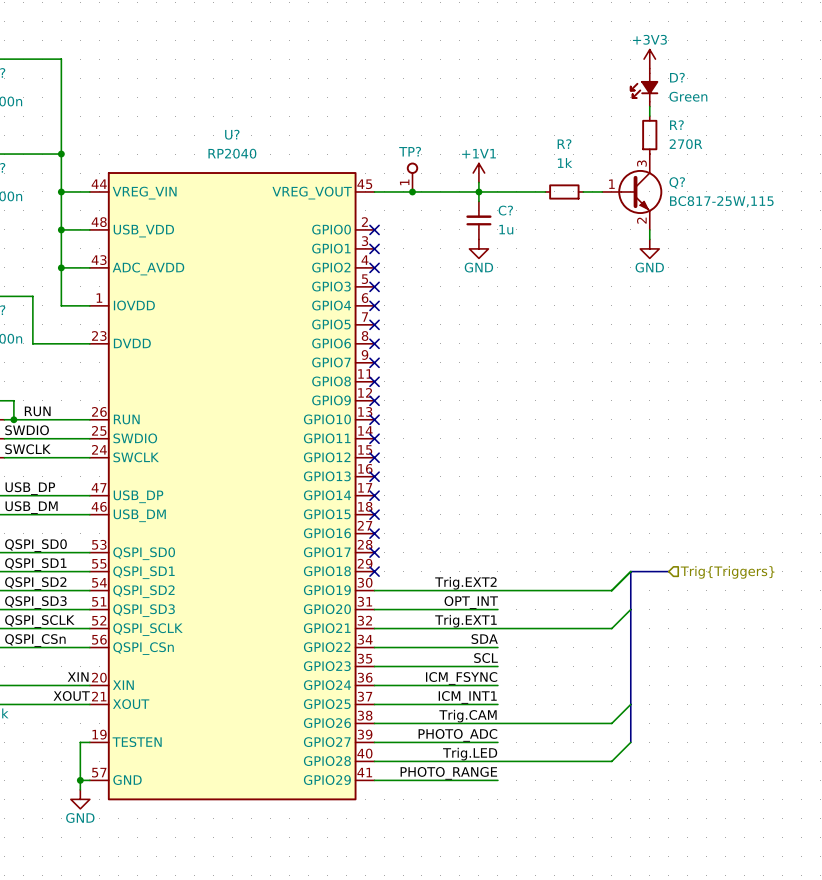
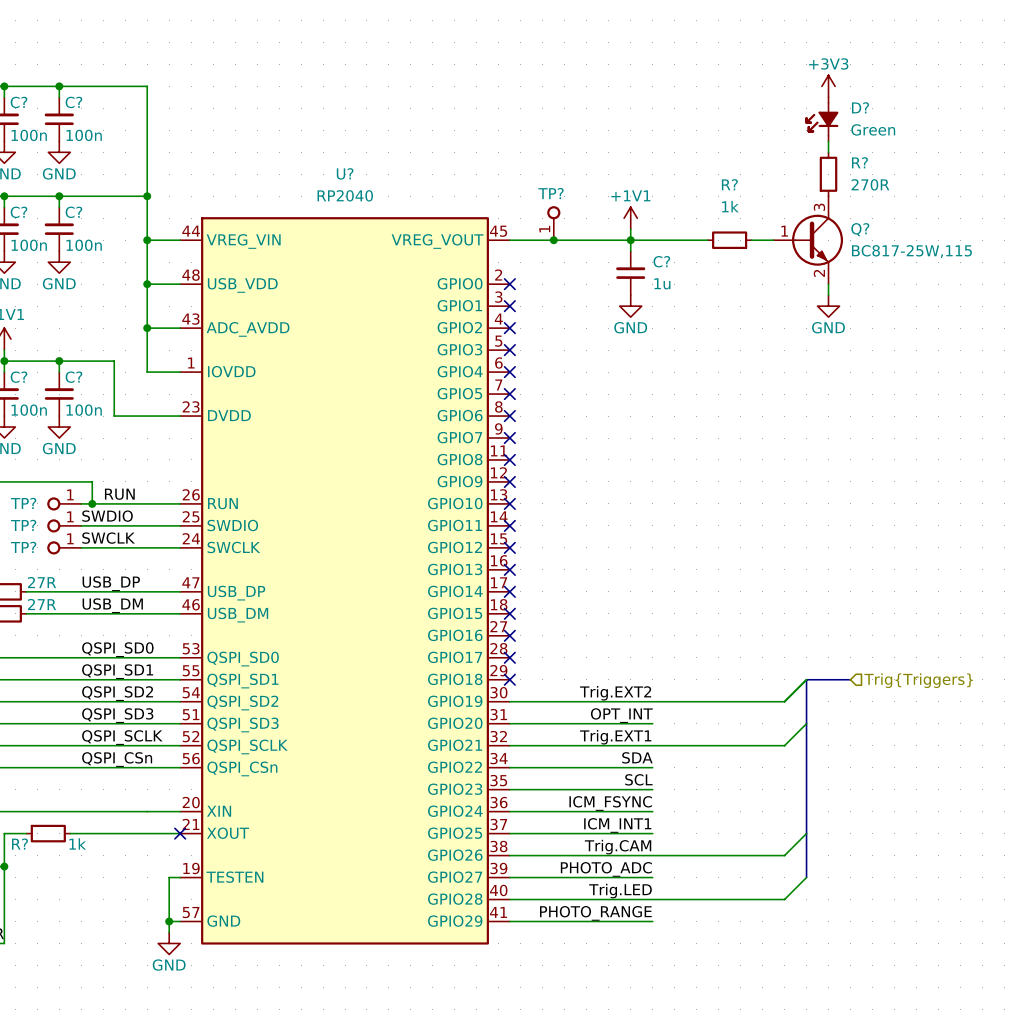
label: XIN (78, 677) -> none
label: XOUT (71, 696) -> none
no-connect mark: none -> (180, 833)

